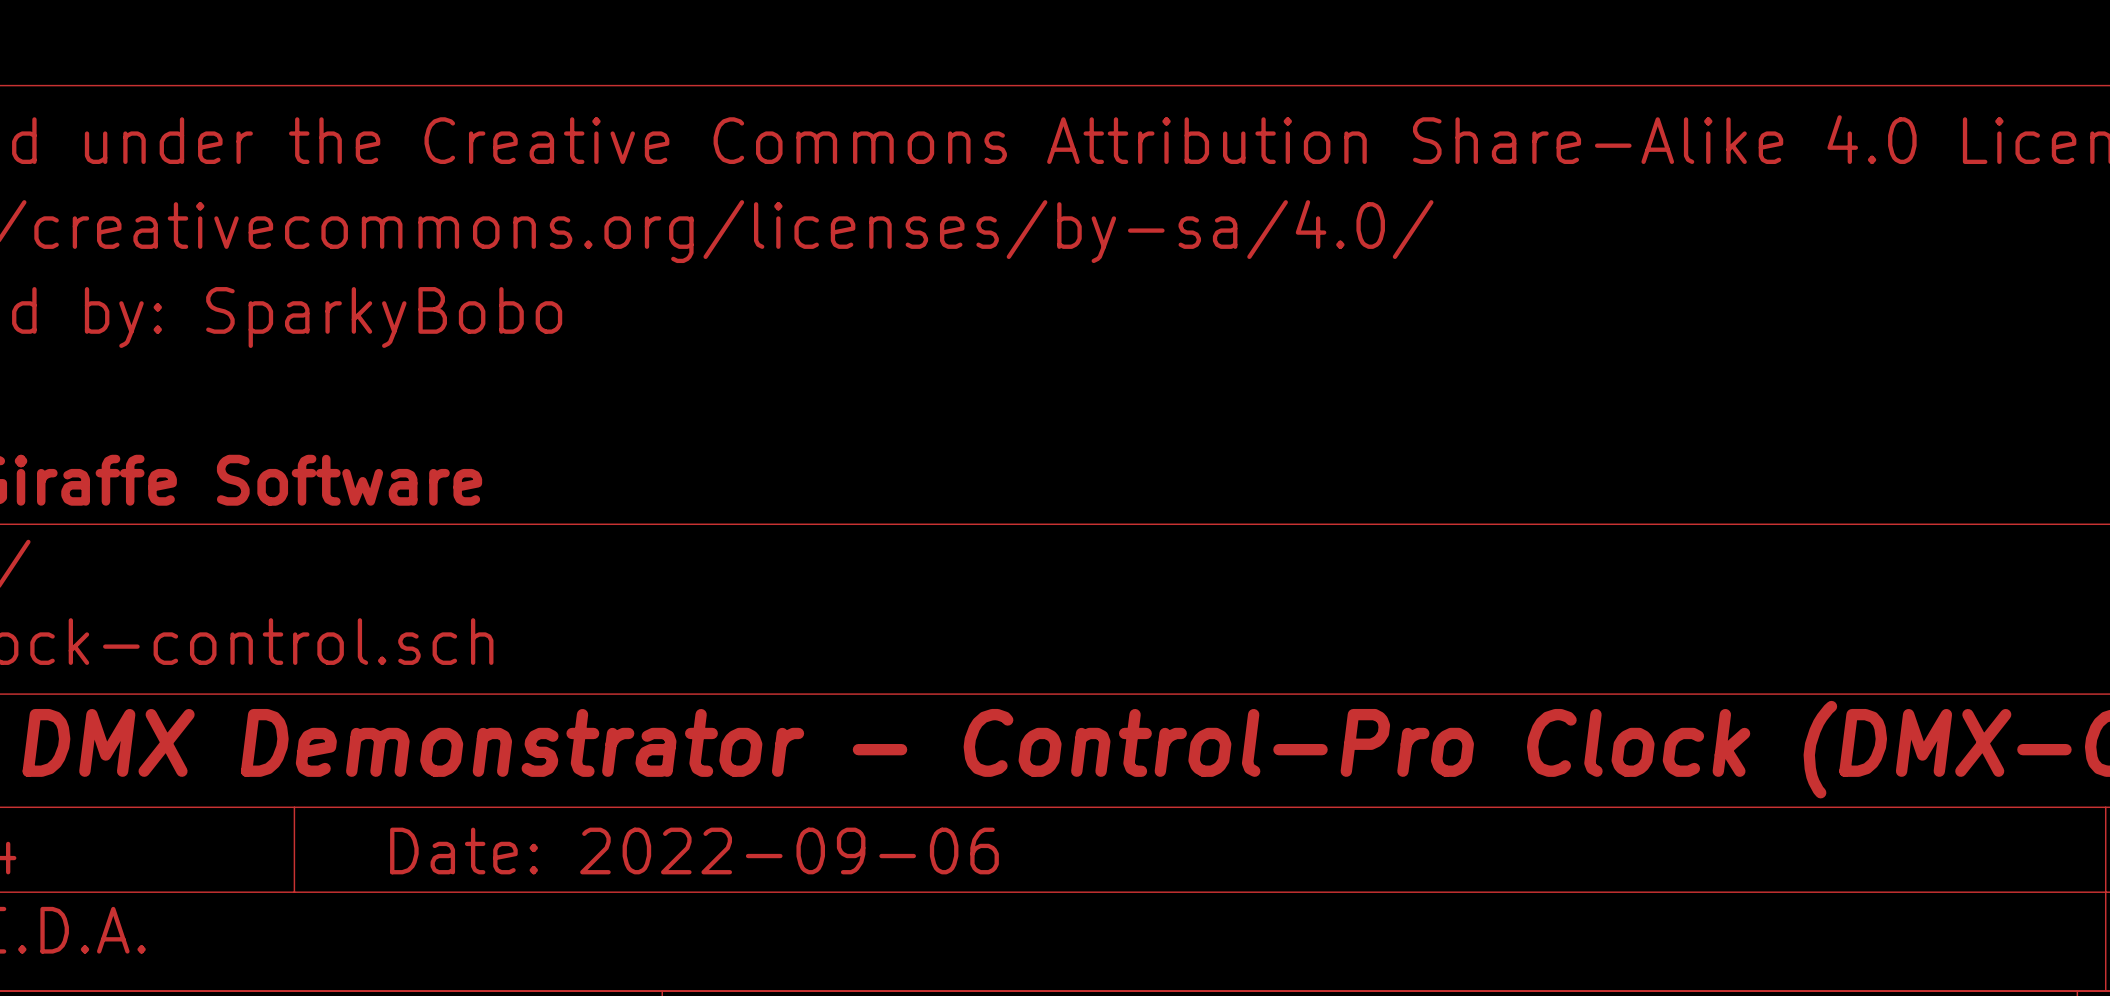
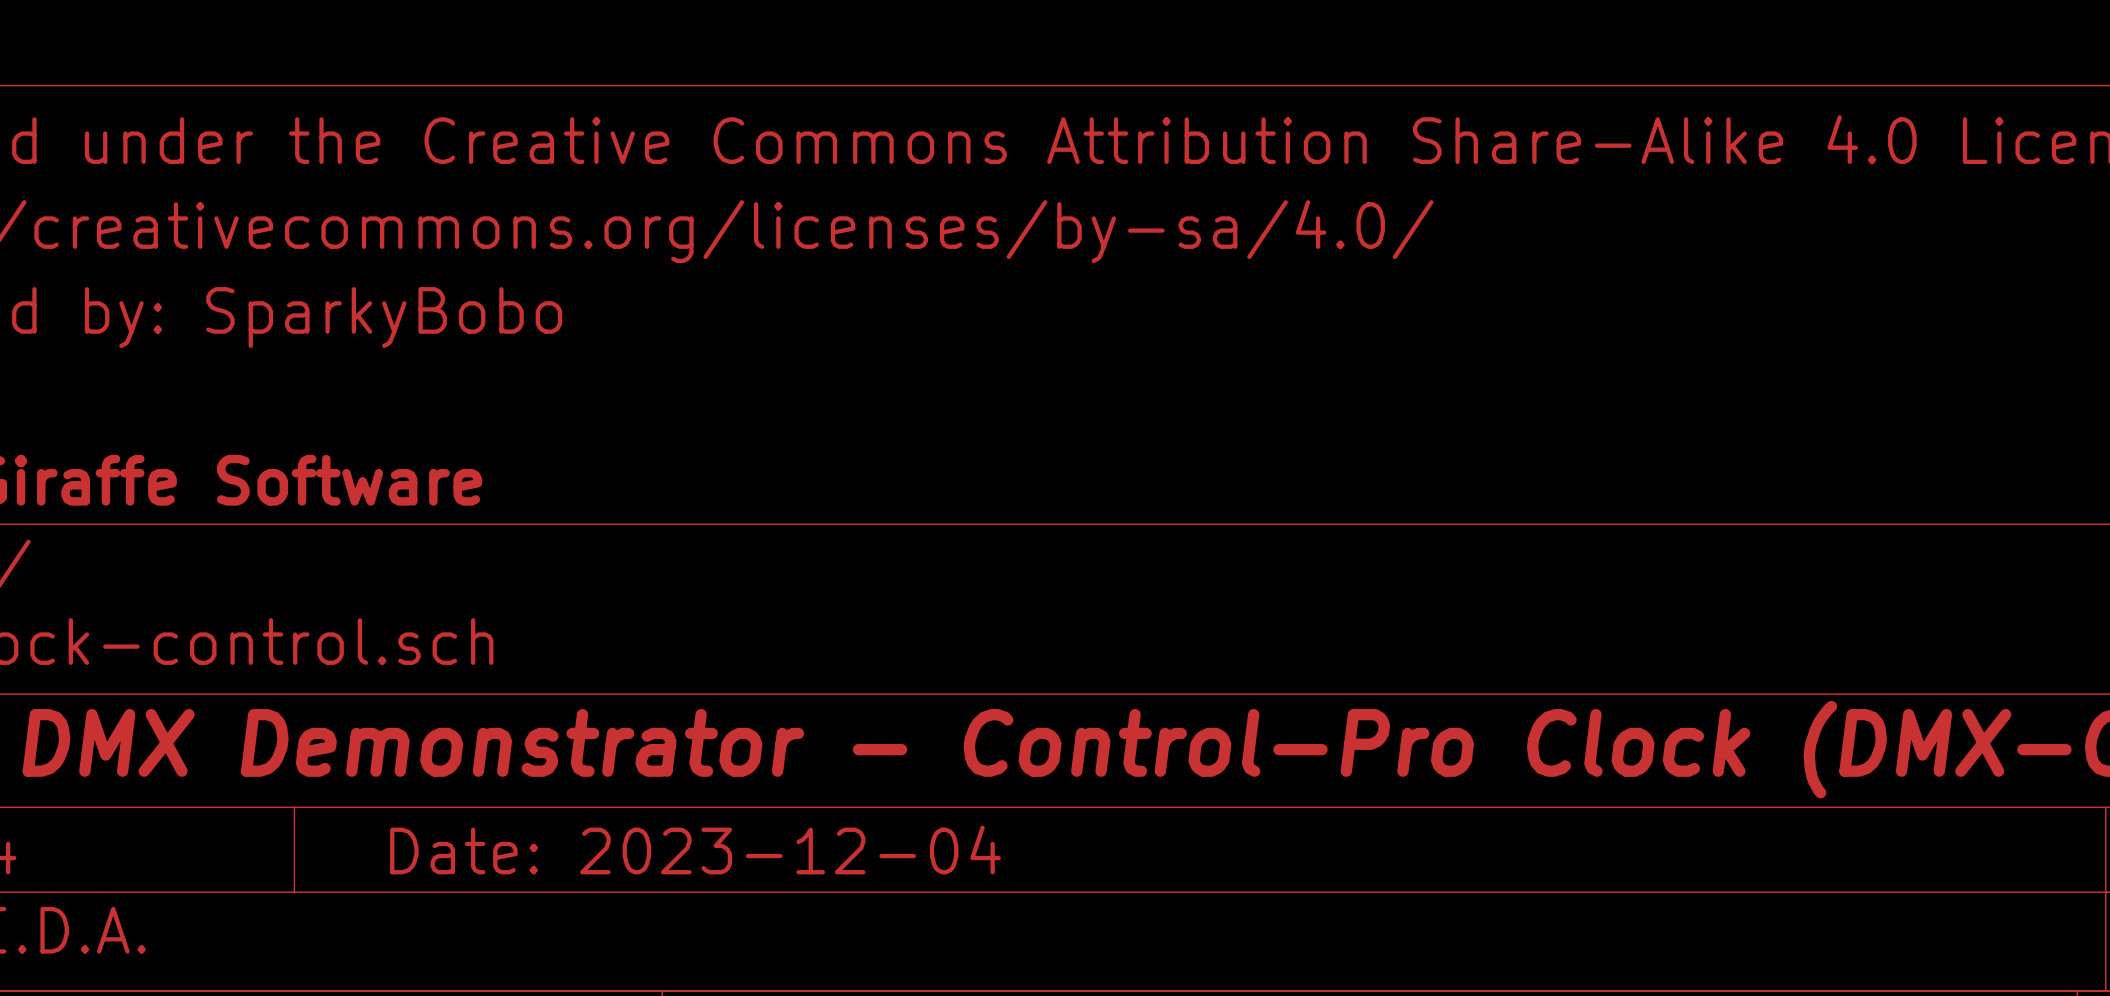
title block: Date: 2022-09-06 (694, 850) -> Date: 2023-12-04 (695, 849)

